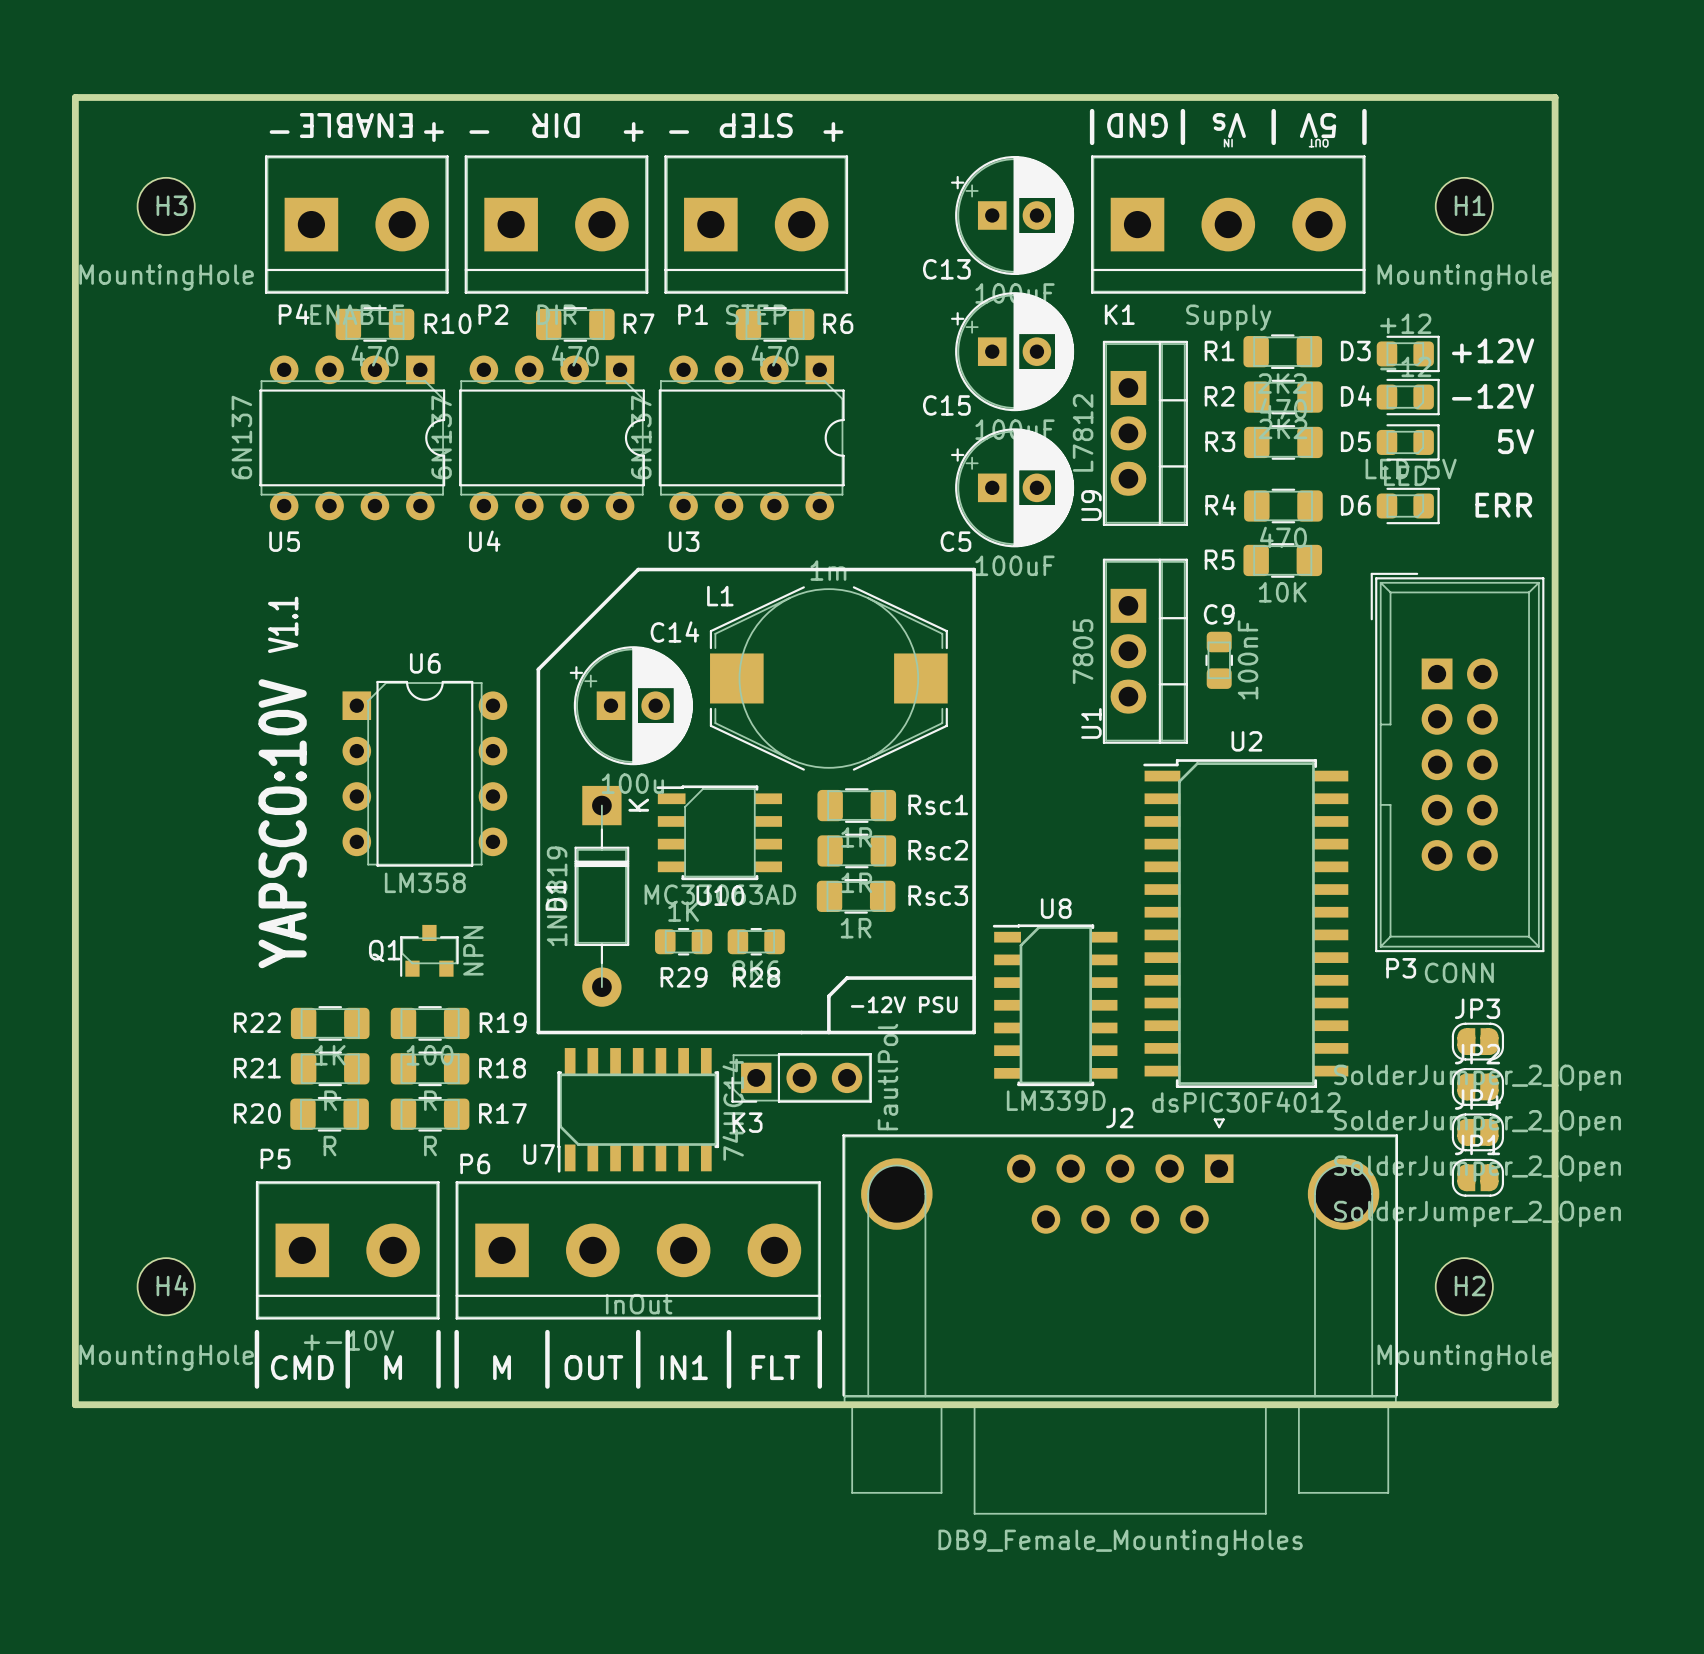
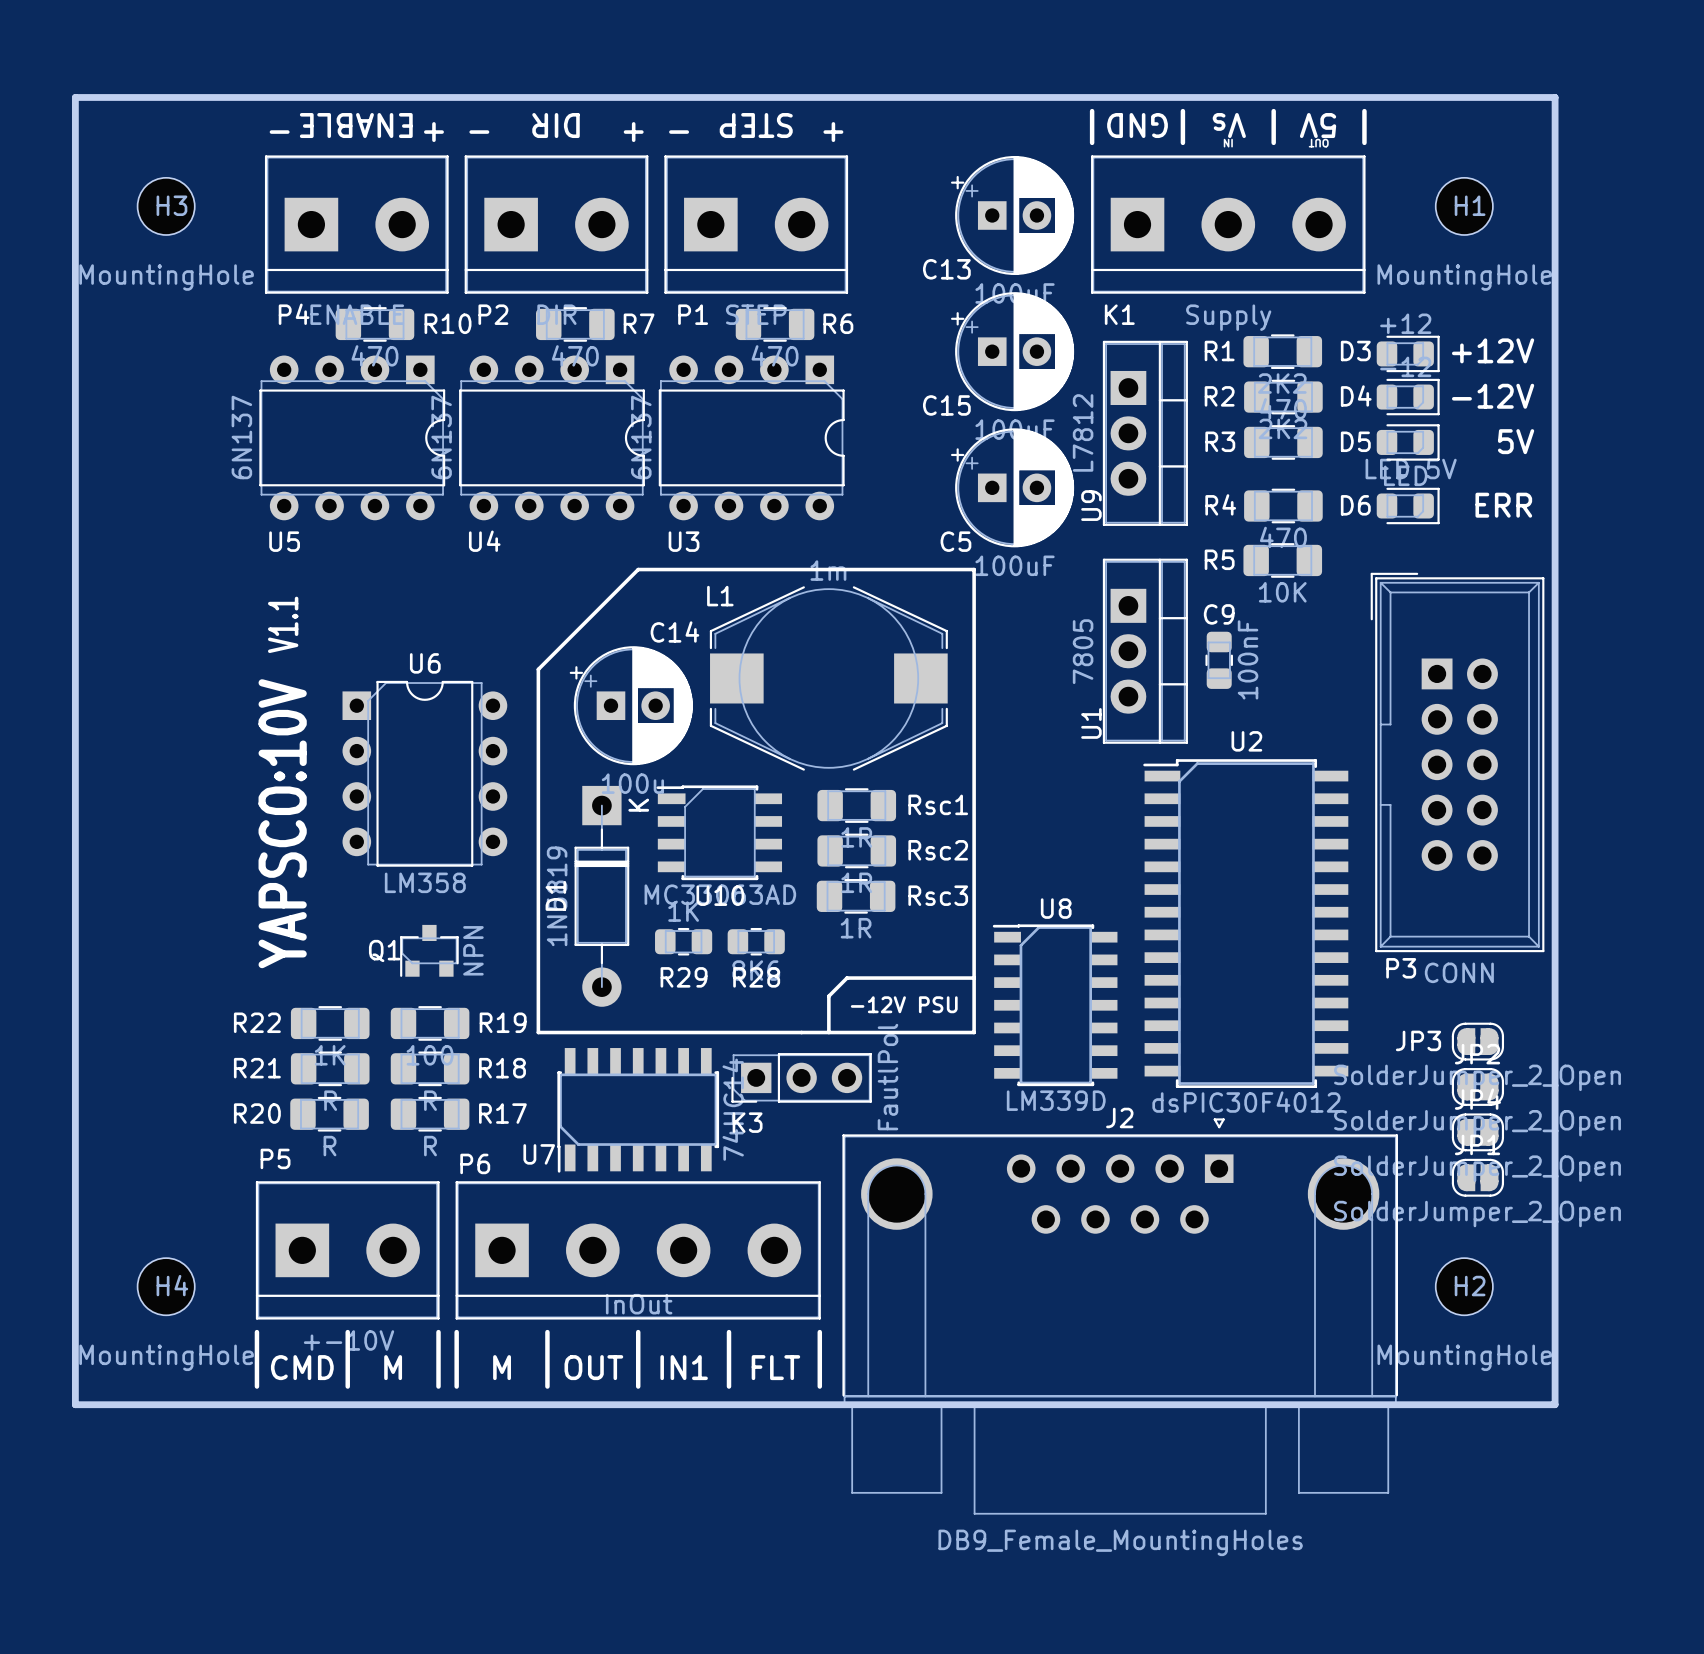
JP3 name position: JP3 (1477, 1008) -> JP3 (1418, 1040)

